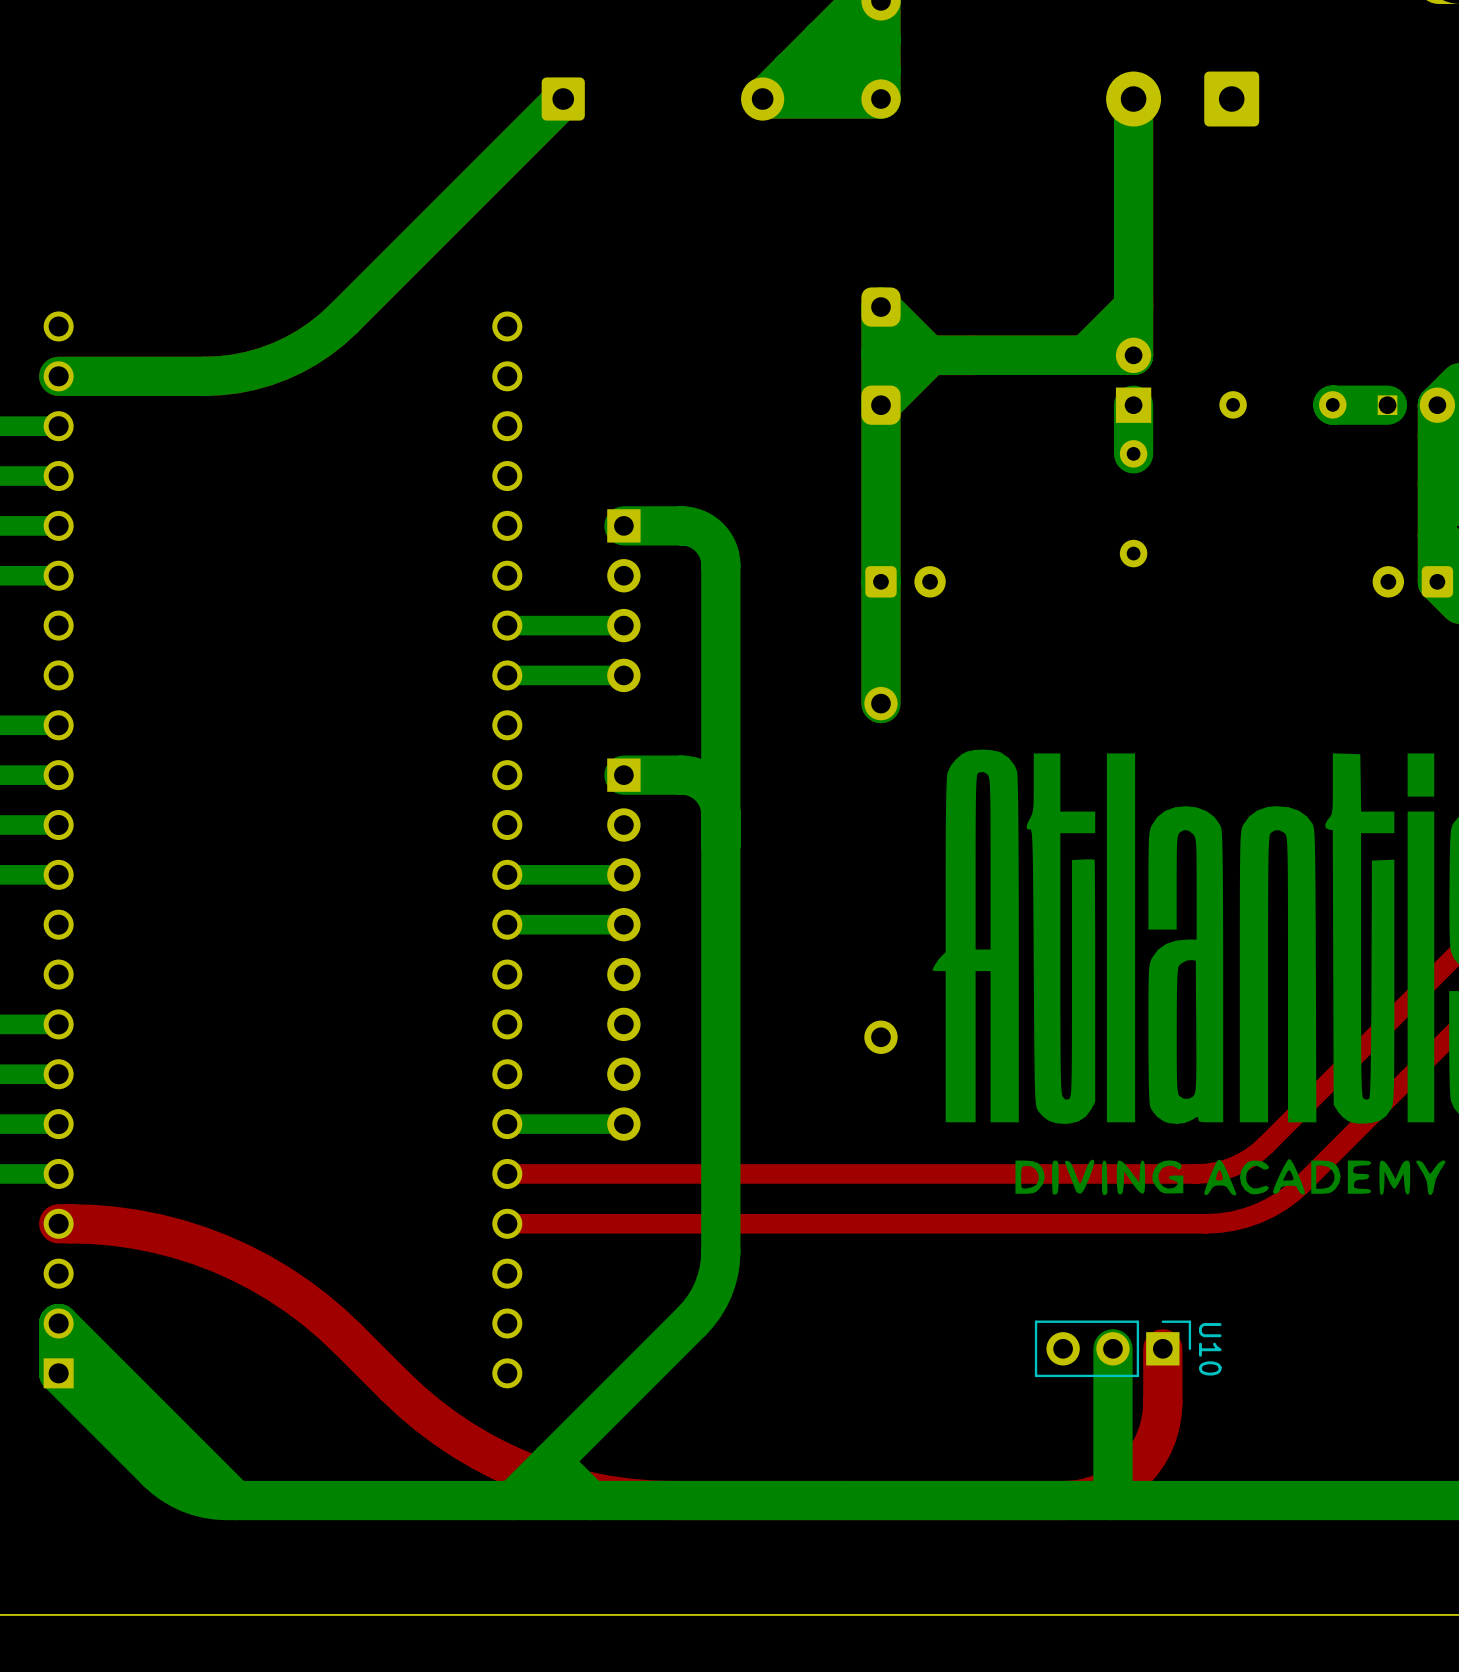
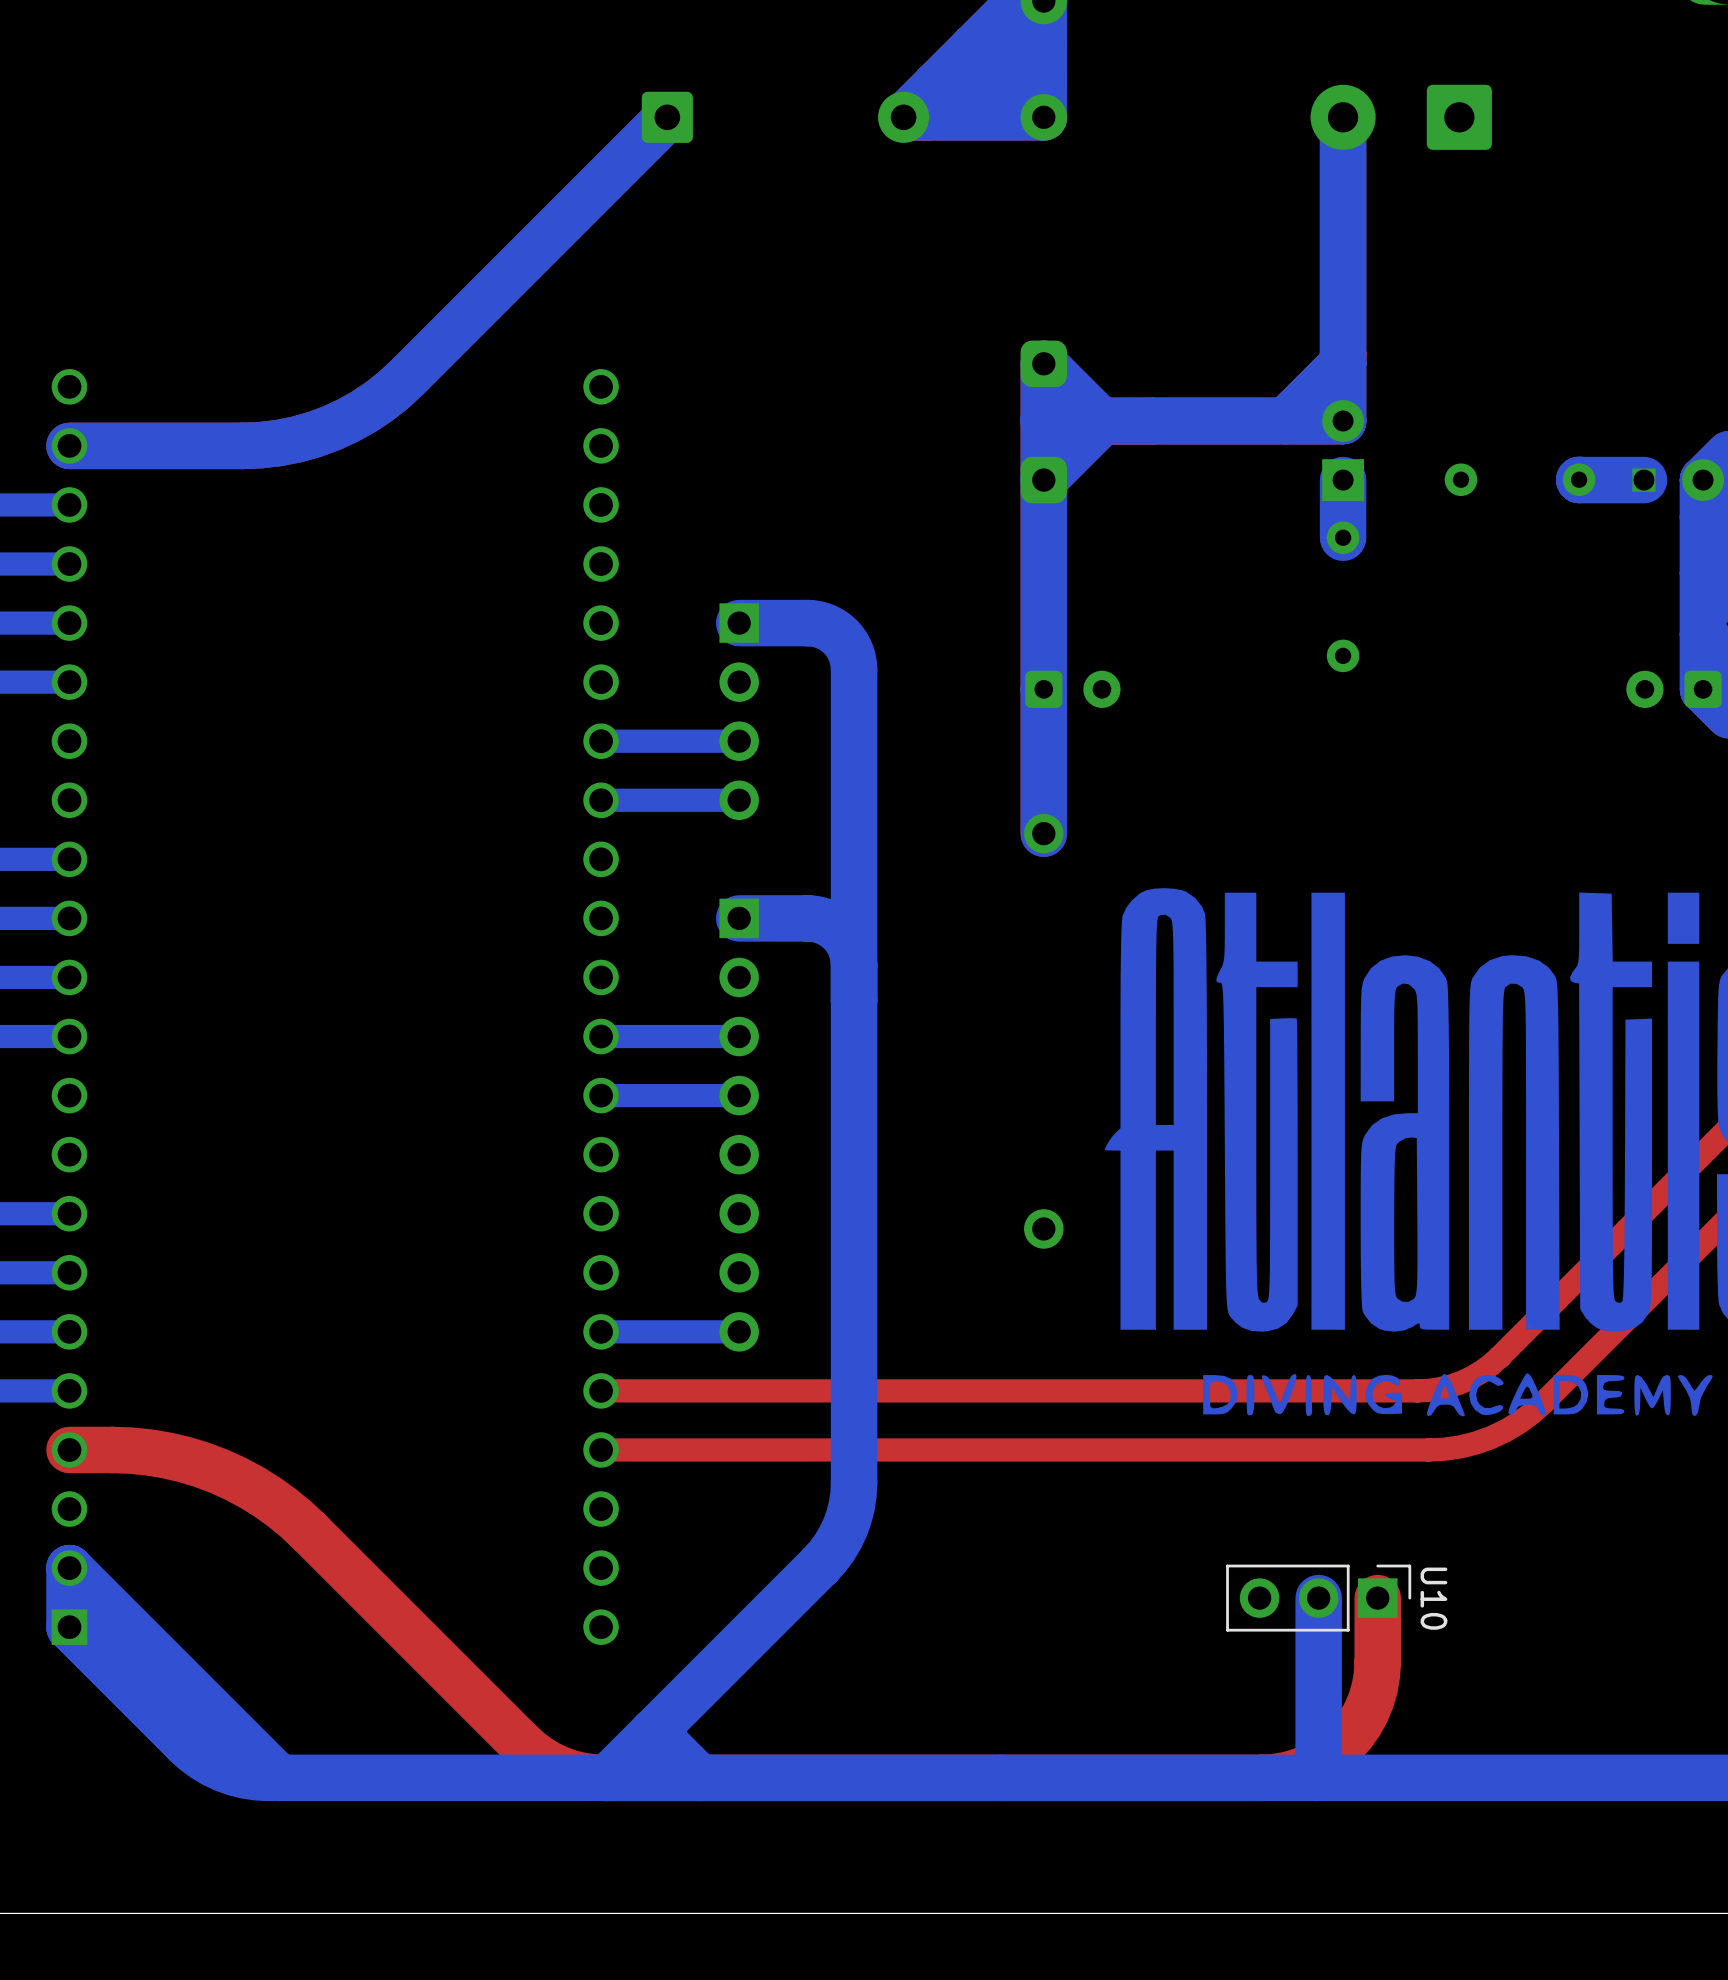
top track: (70, 1223) (114, 1226) (157, 1233) (199, 1245) (260, 1272) (297, 1296) (331, 1323) (427, 1414) (463, 1440) (501, 1461) (542, 1478) (584, 1490) (628, 1498) (672, 1500) -> (83, 1449) (130, 1450) (184, 1459) (235, 1478) (267, 1497) (309, 1531) (521, 1743) (539, 1758) (559, 1769) (580, 1775) (603, 1777) (796, 1777)

